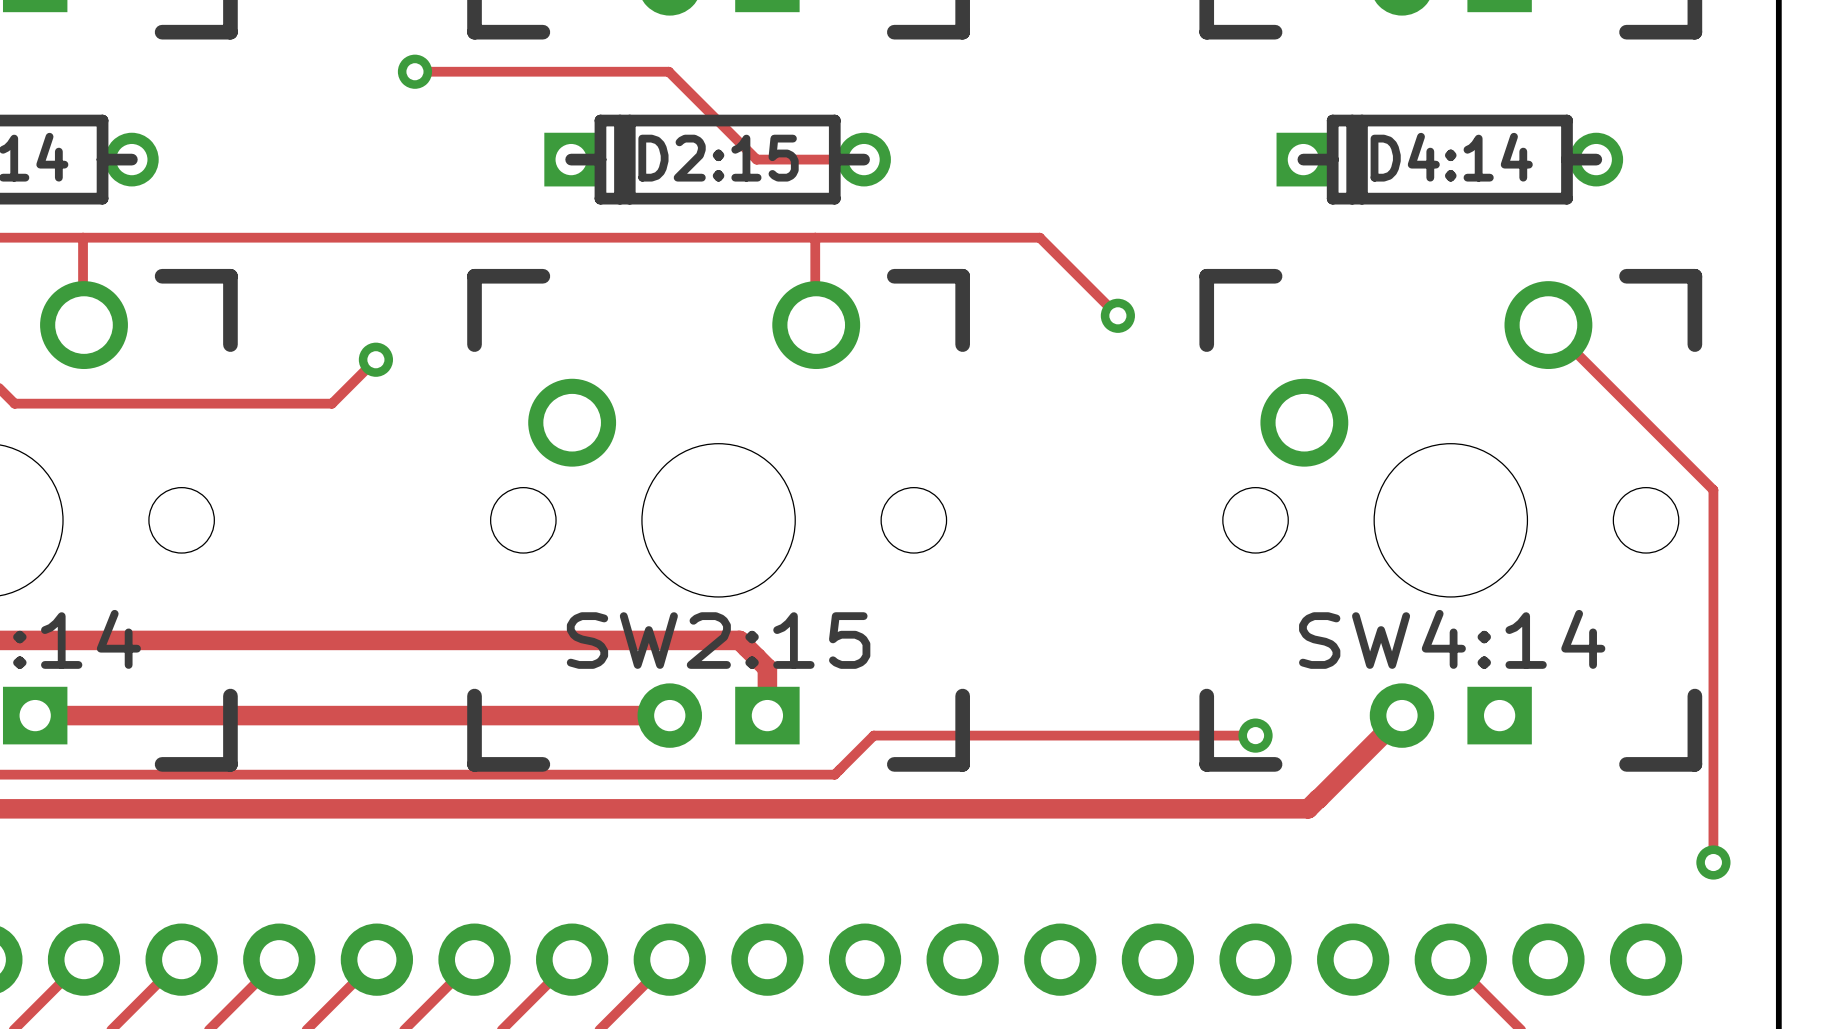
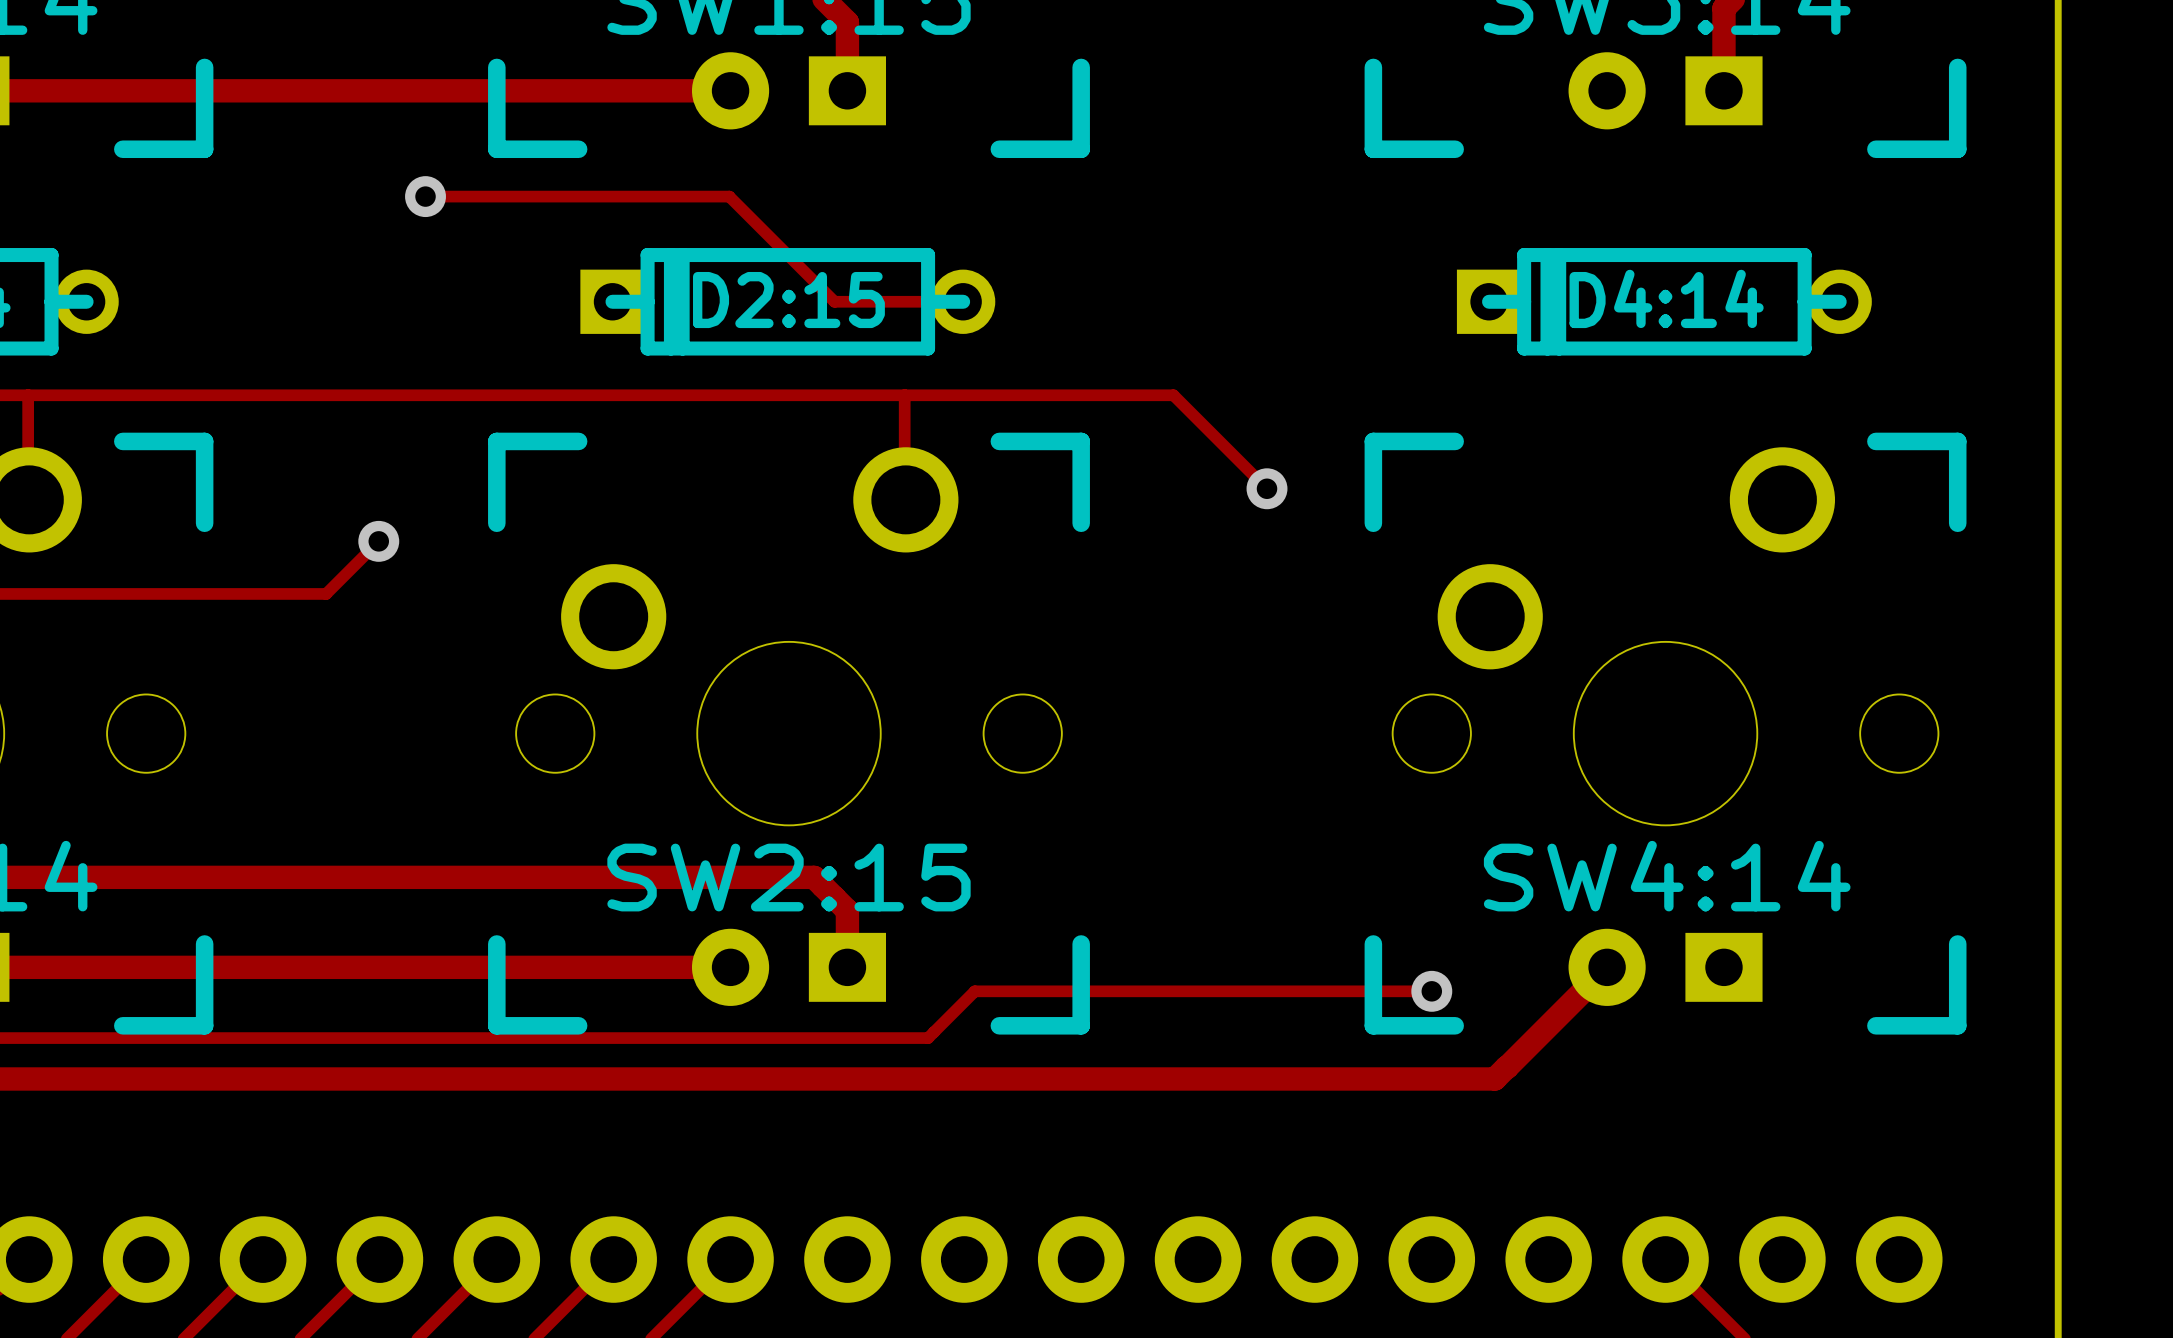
track: (1548, 325) (1713, 490) (1713, 862) -> none
via: (1713, 862) -> none

